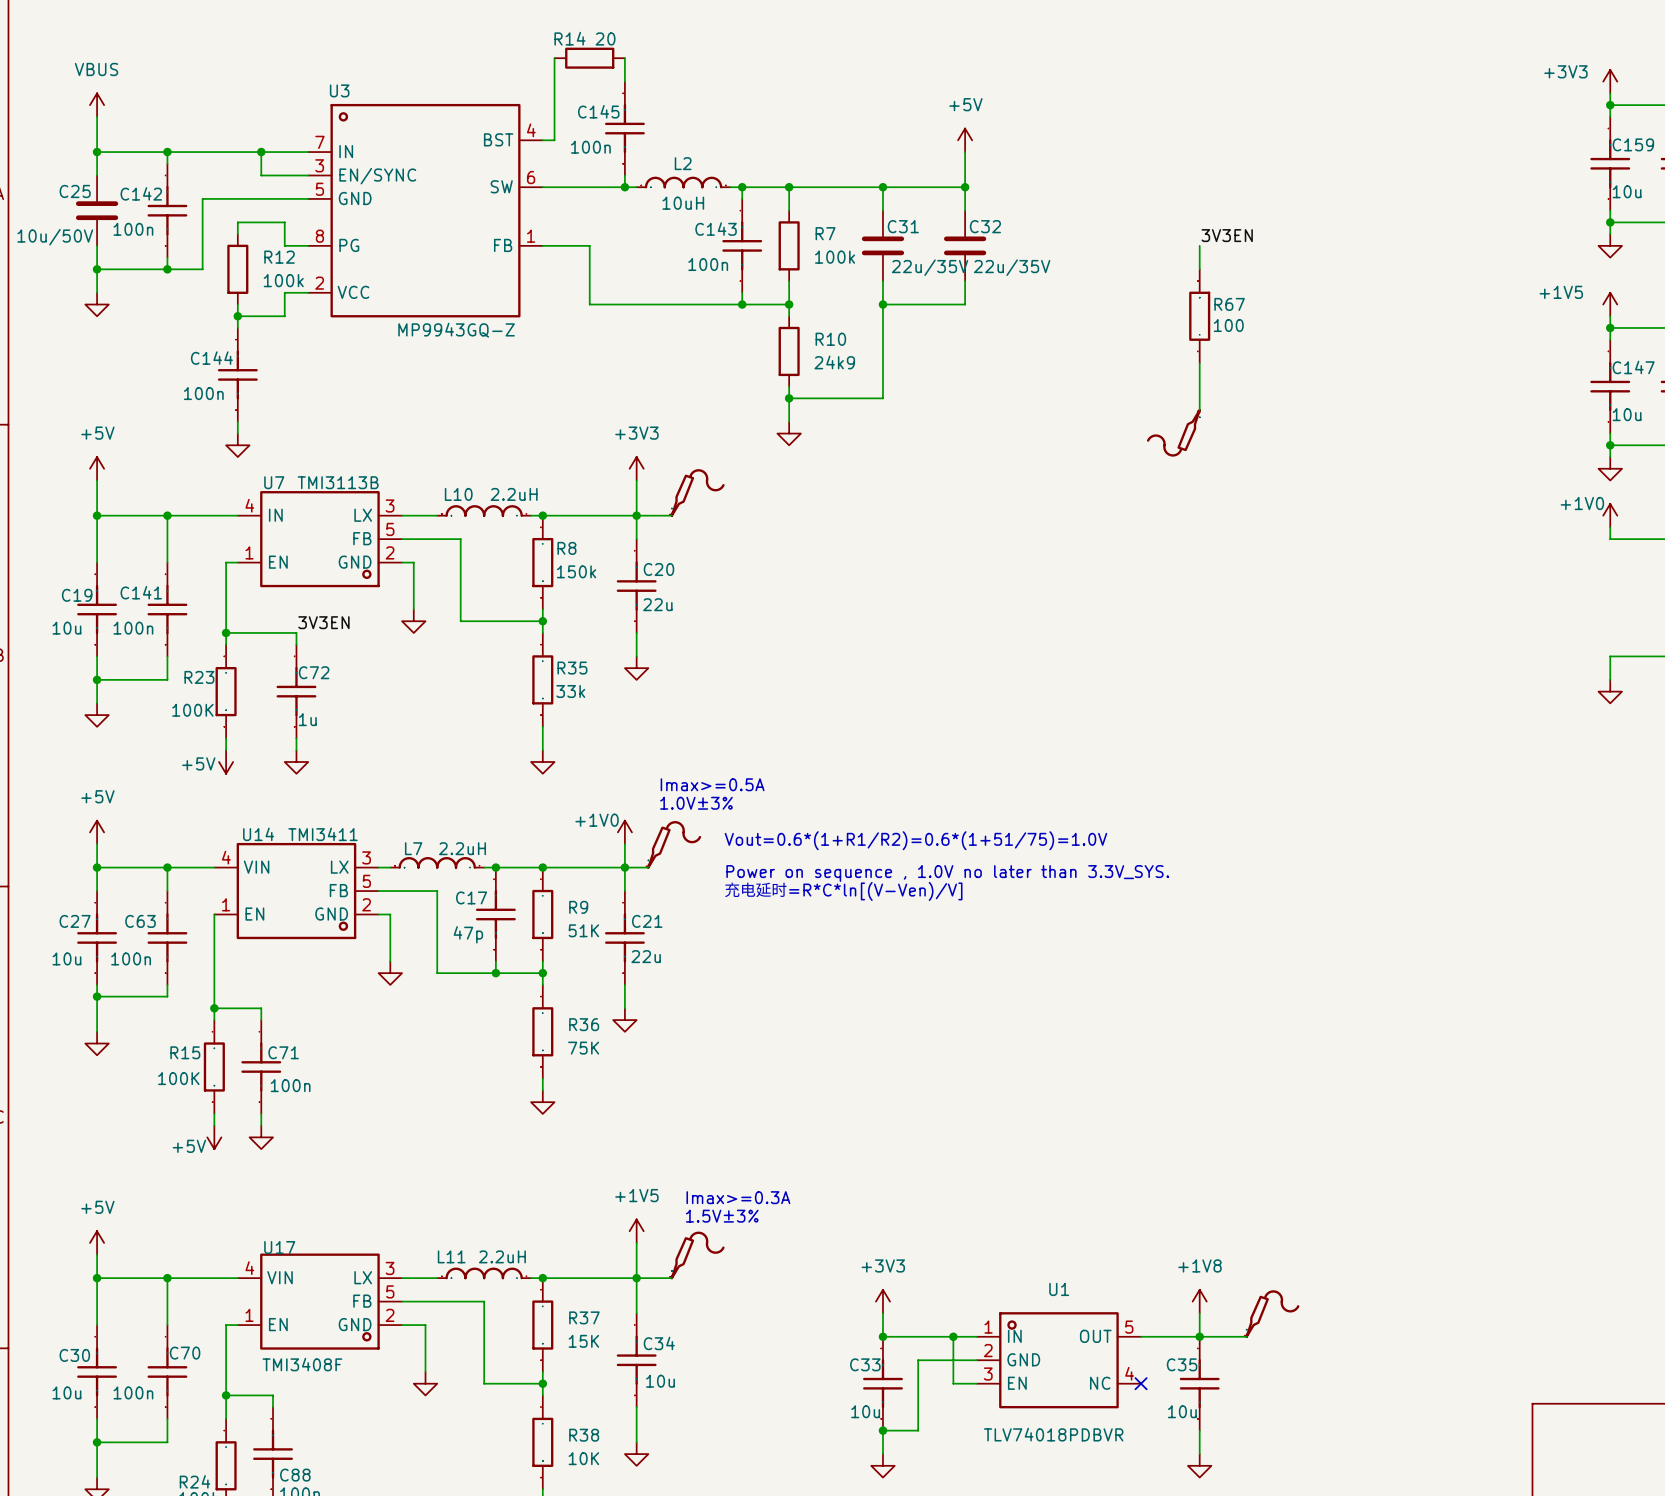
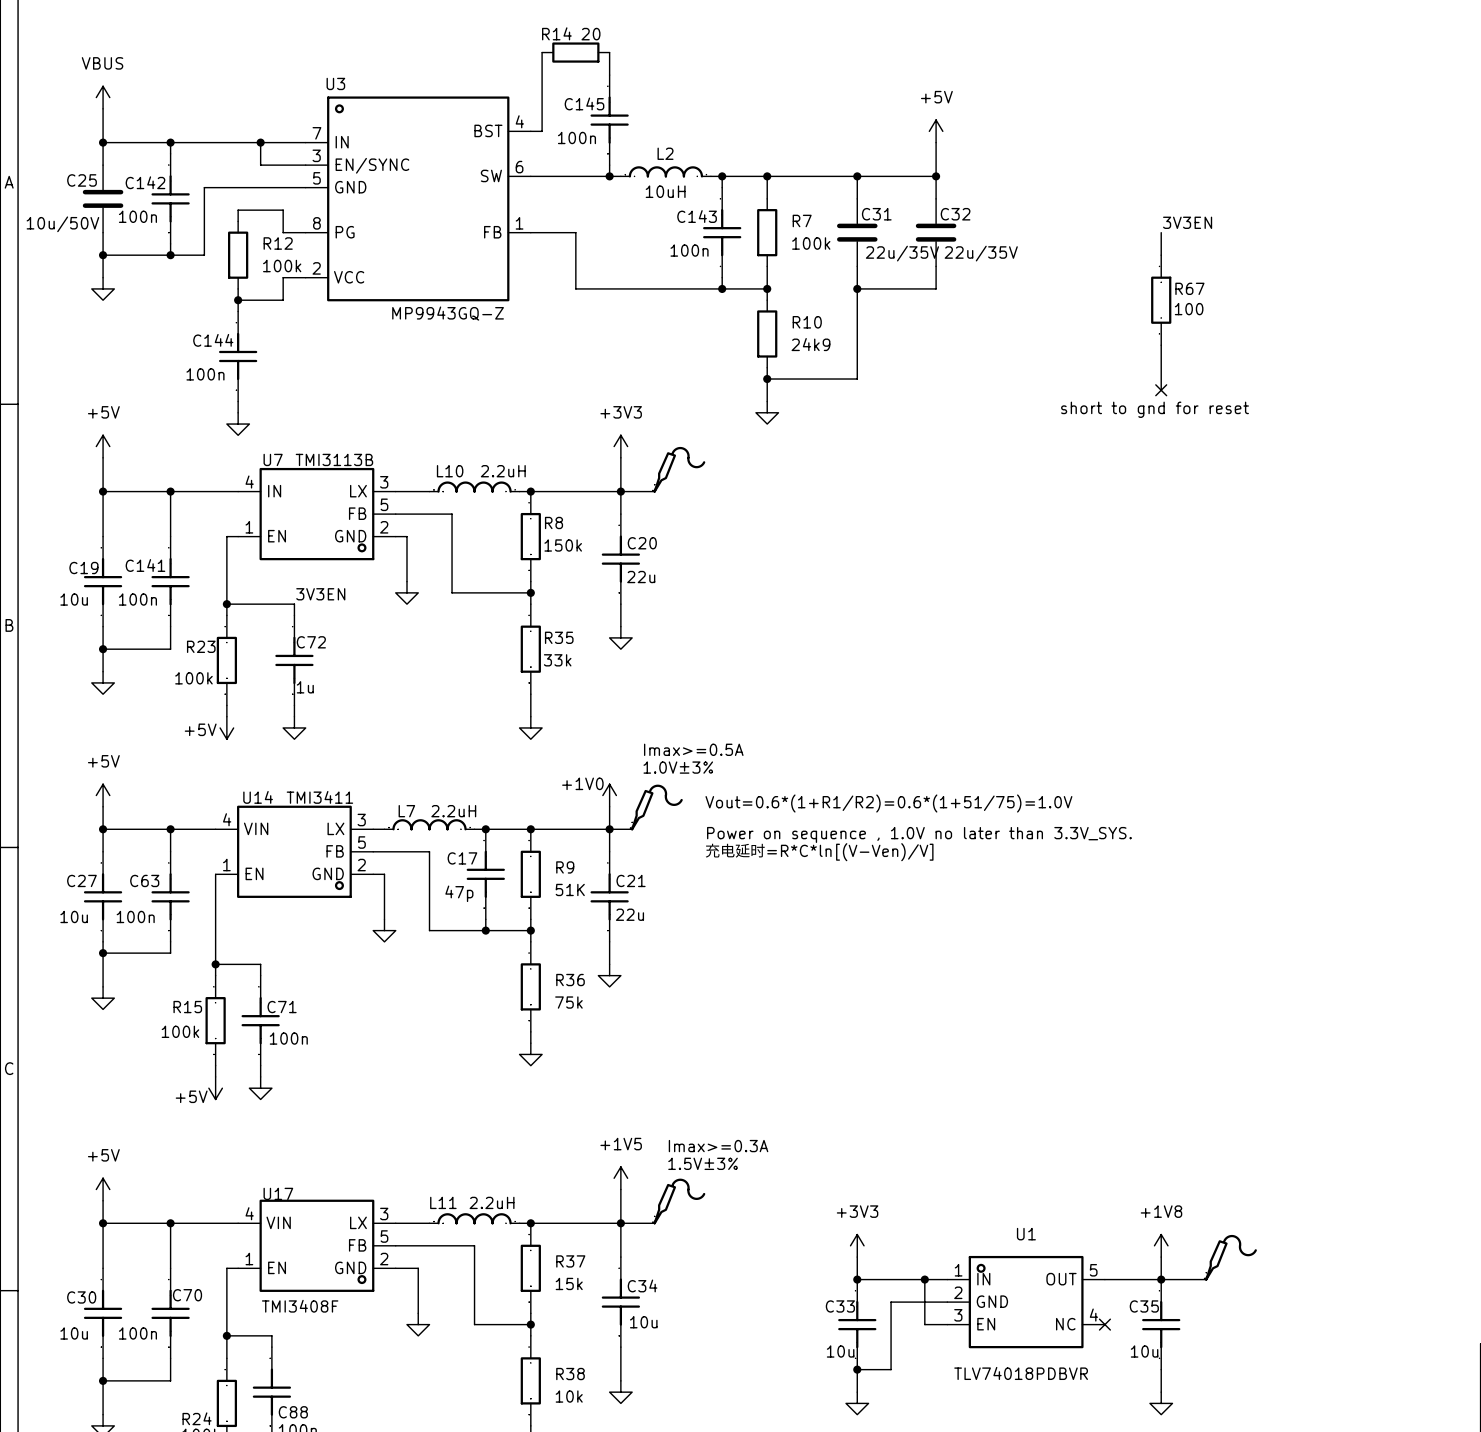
no-connect mark: none -> (1161, 390)
text: none -> short to gnd for reset (1155, 409)
part: (1173, 432) -> none
R23 value: 100K (192, 710) -> 100k (193, 678)
R36 value: 75K (583, 1048) -> 75k (568, 1002)
R15 value: 100K (178, 1078) -> 100k (180, 1031)
R37 value: 15K (583, 1341) -> 15k (569, 1283)
R38 value: 10K (583, 1458) -> 10k (569, 1396)

